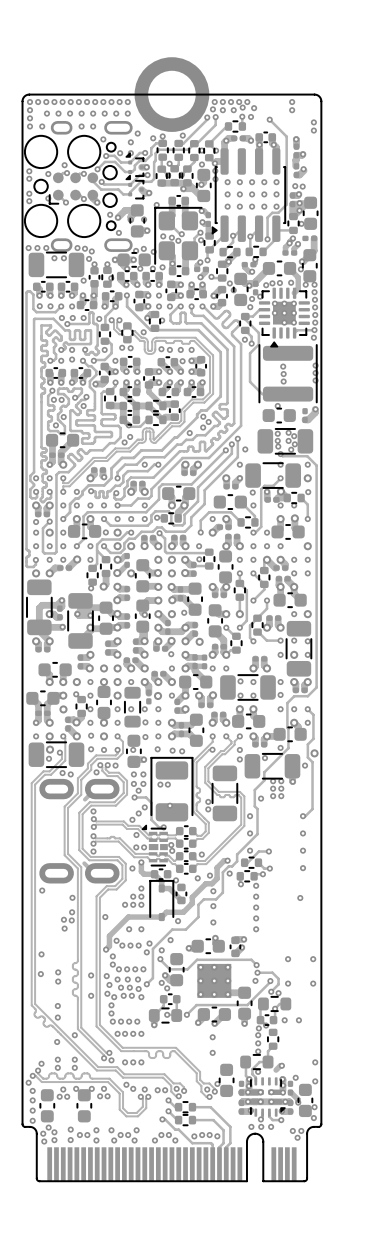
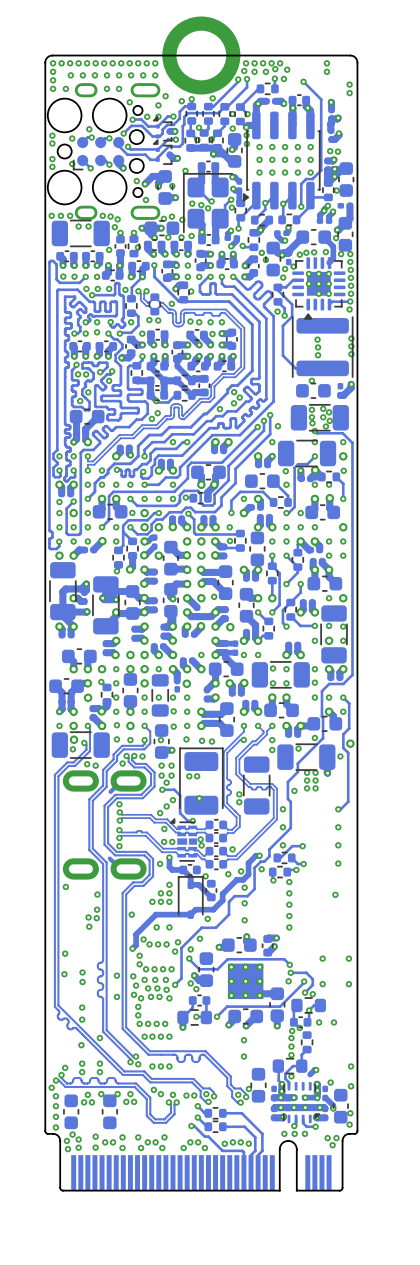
via: (171, 654) -> none
via: (171, 695) -> none

